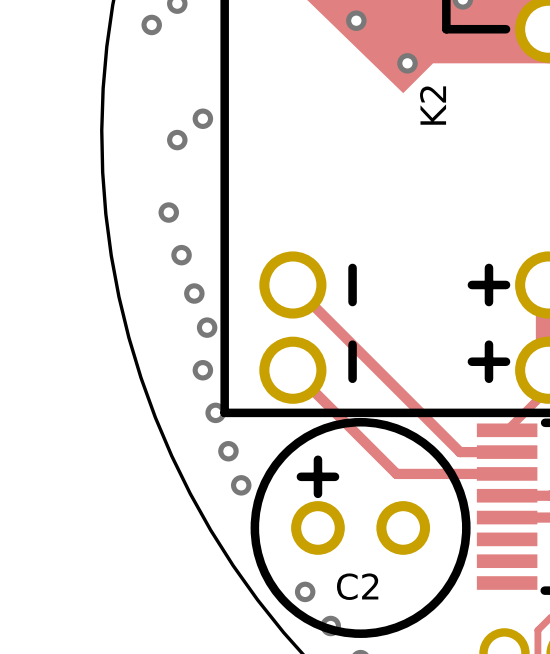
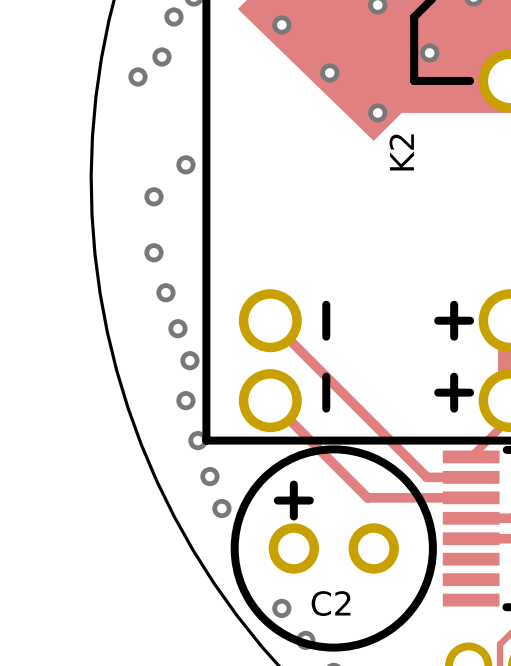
via position: (177, 140) -> (153, 196)

